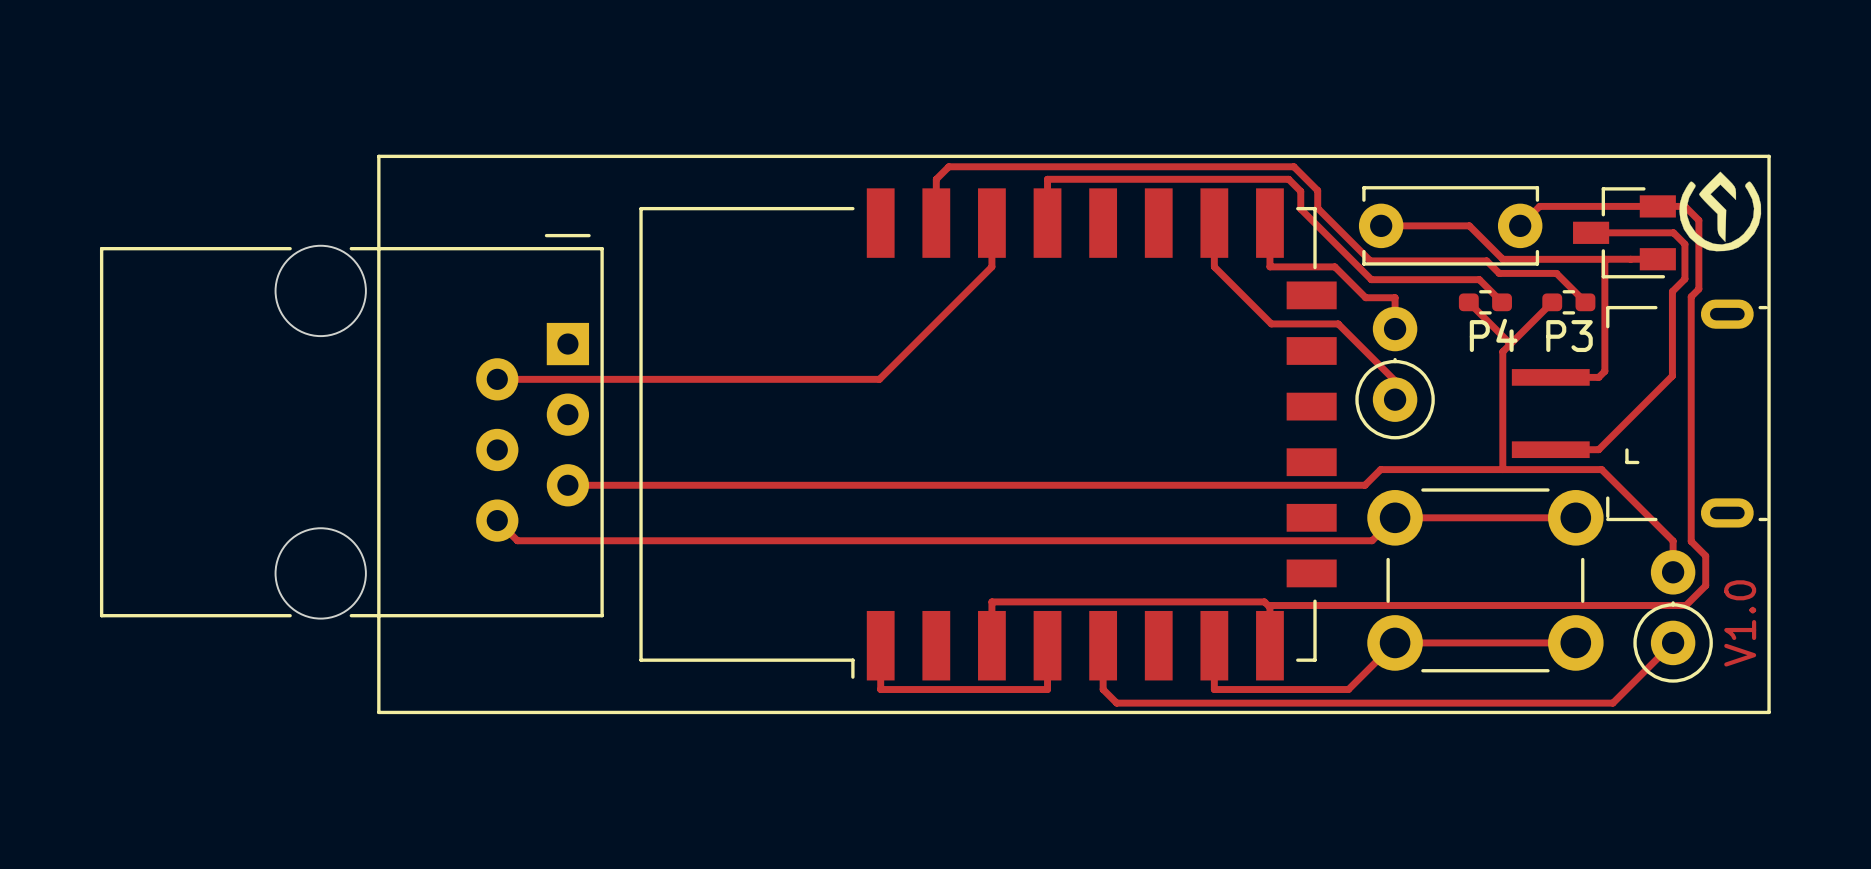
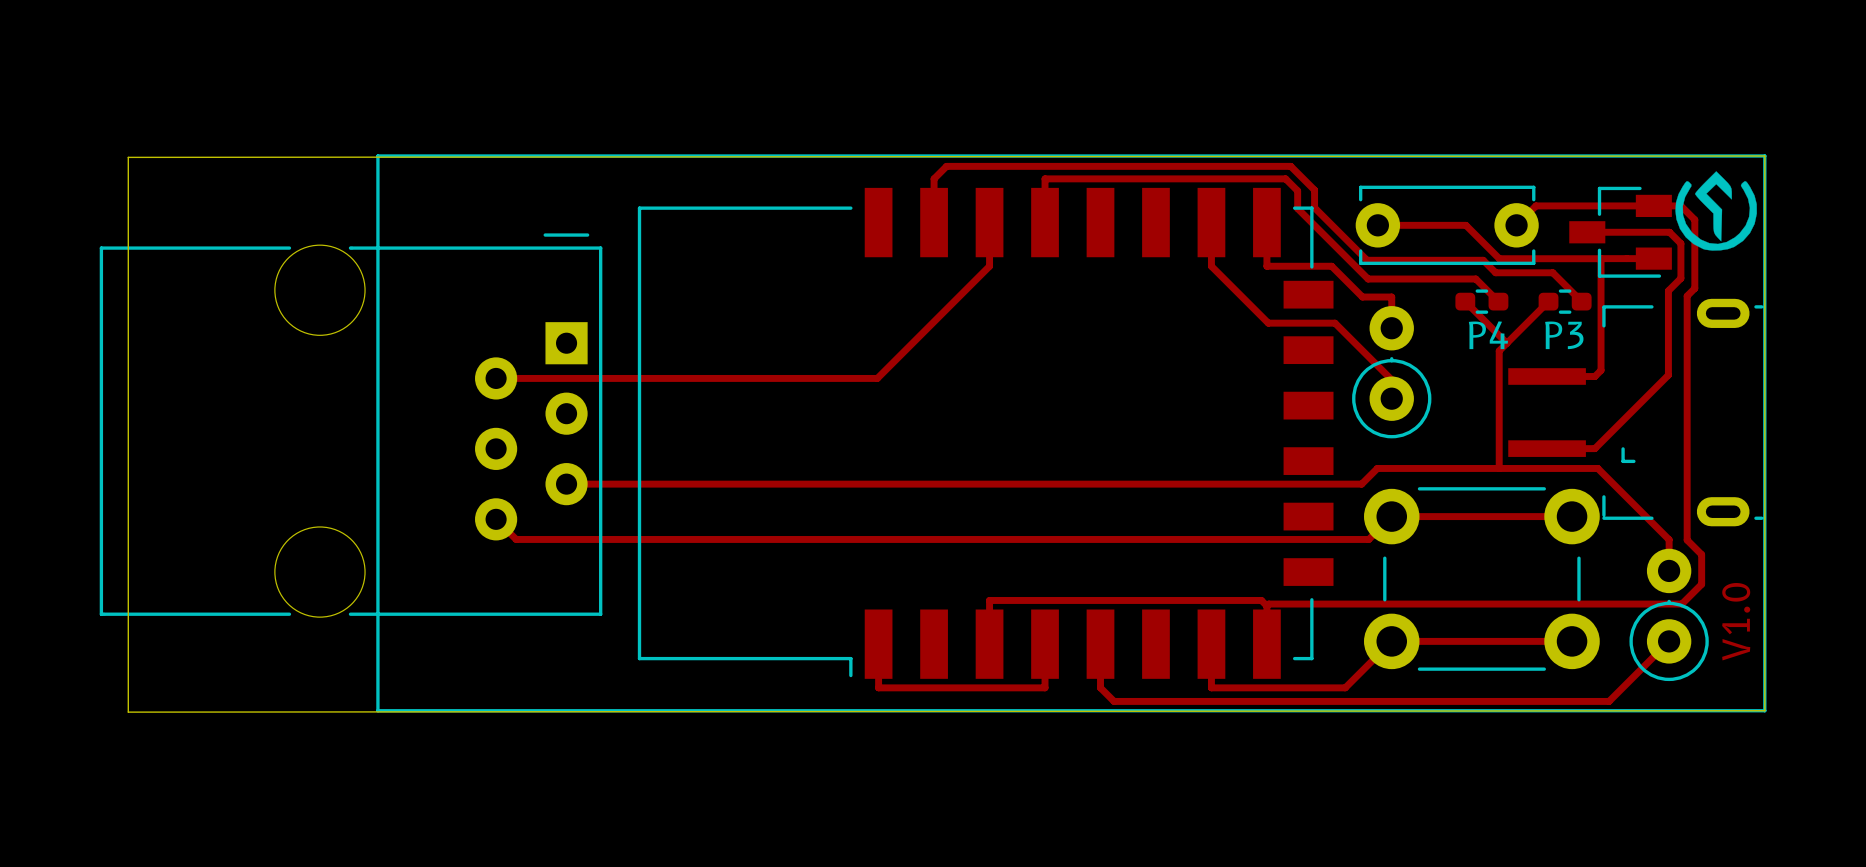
board edge: none -> (1764, 155) (128, 157) (128, 712) (1764, 710) (1764, 155)

